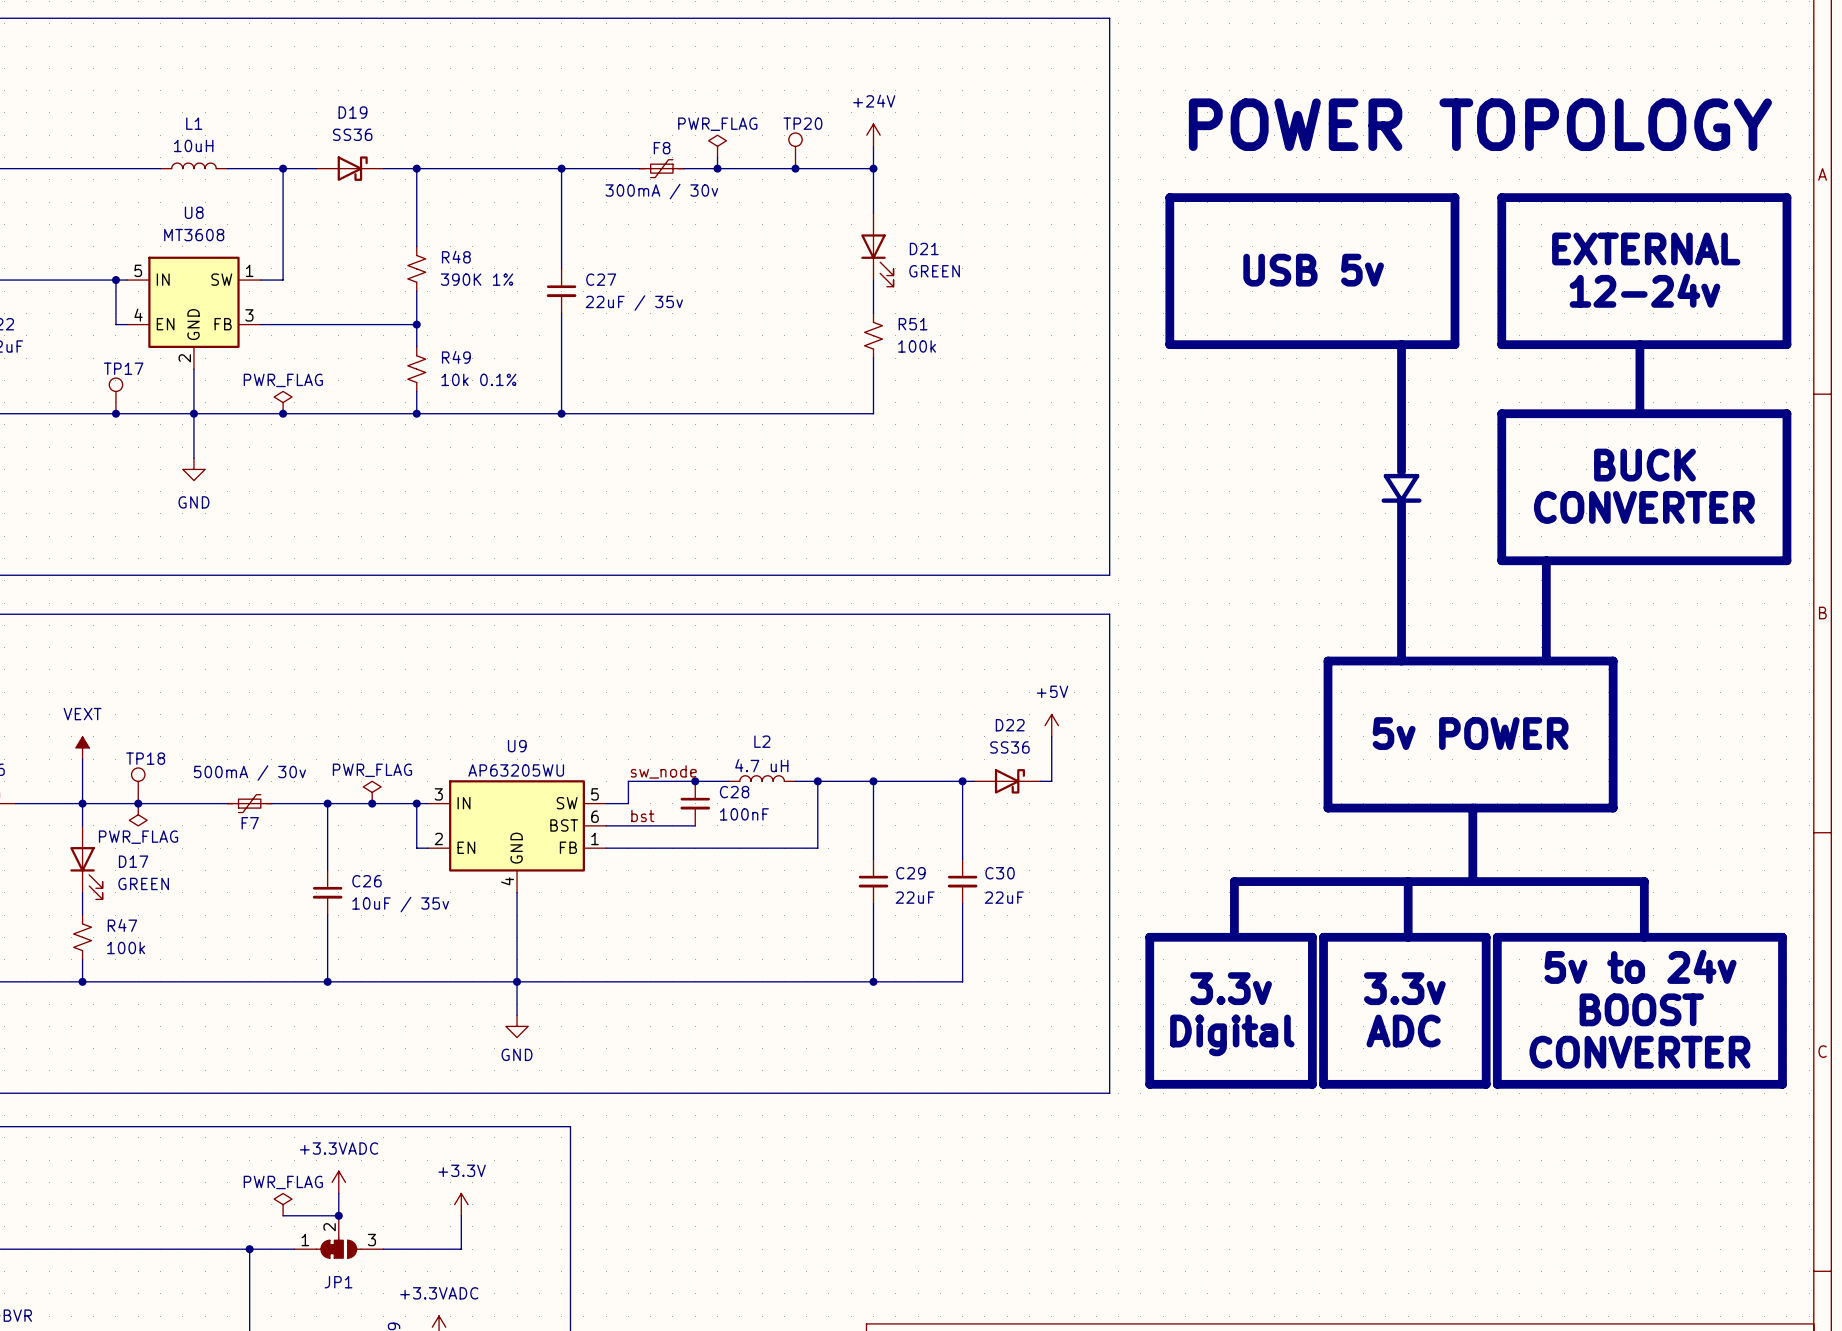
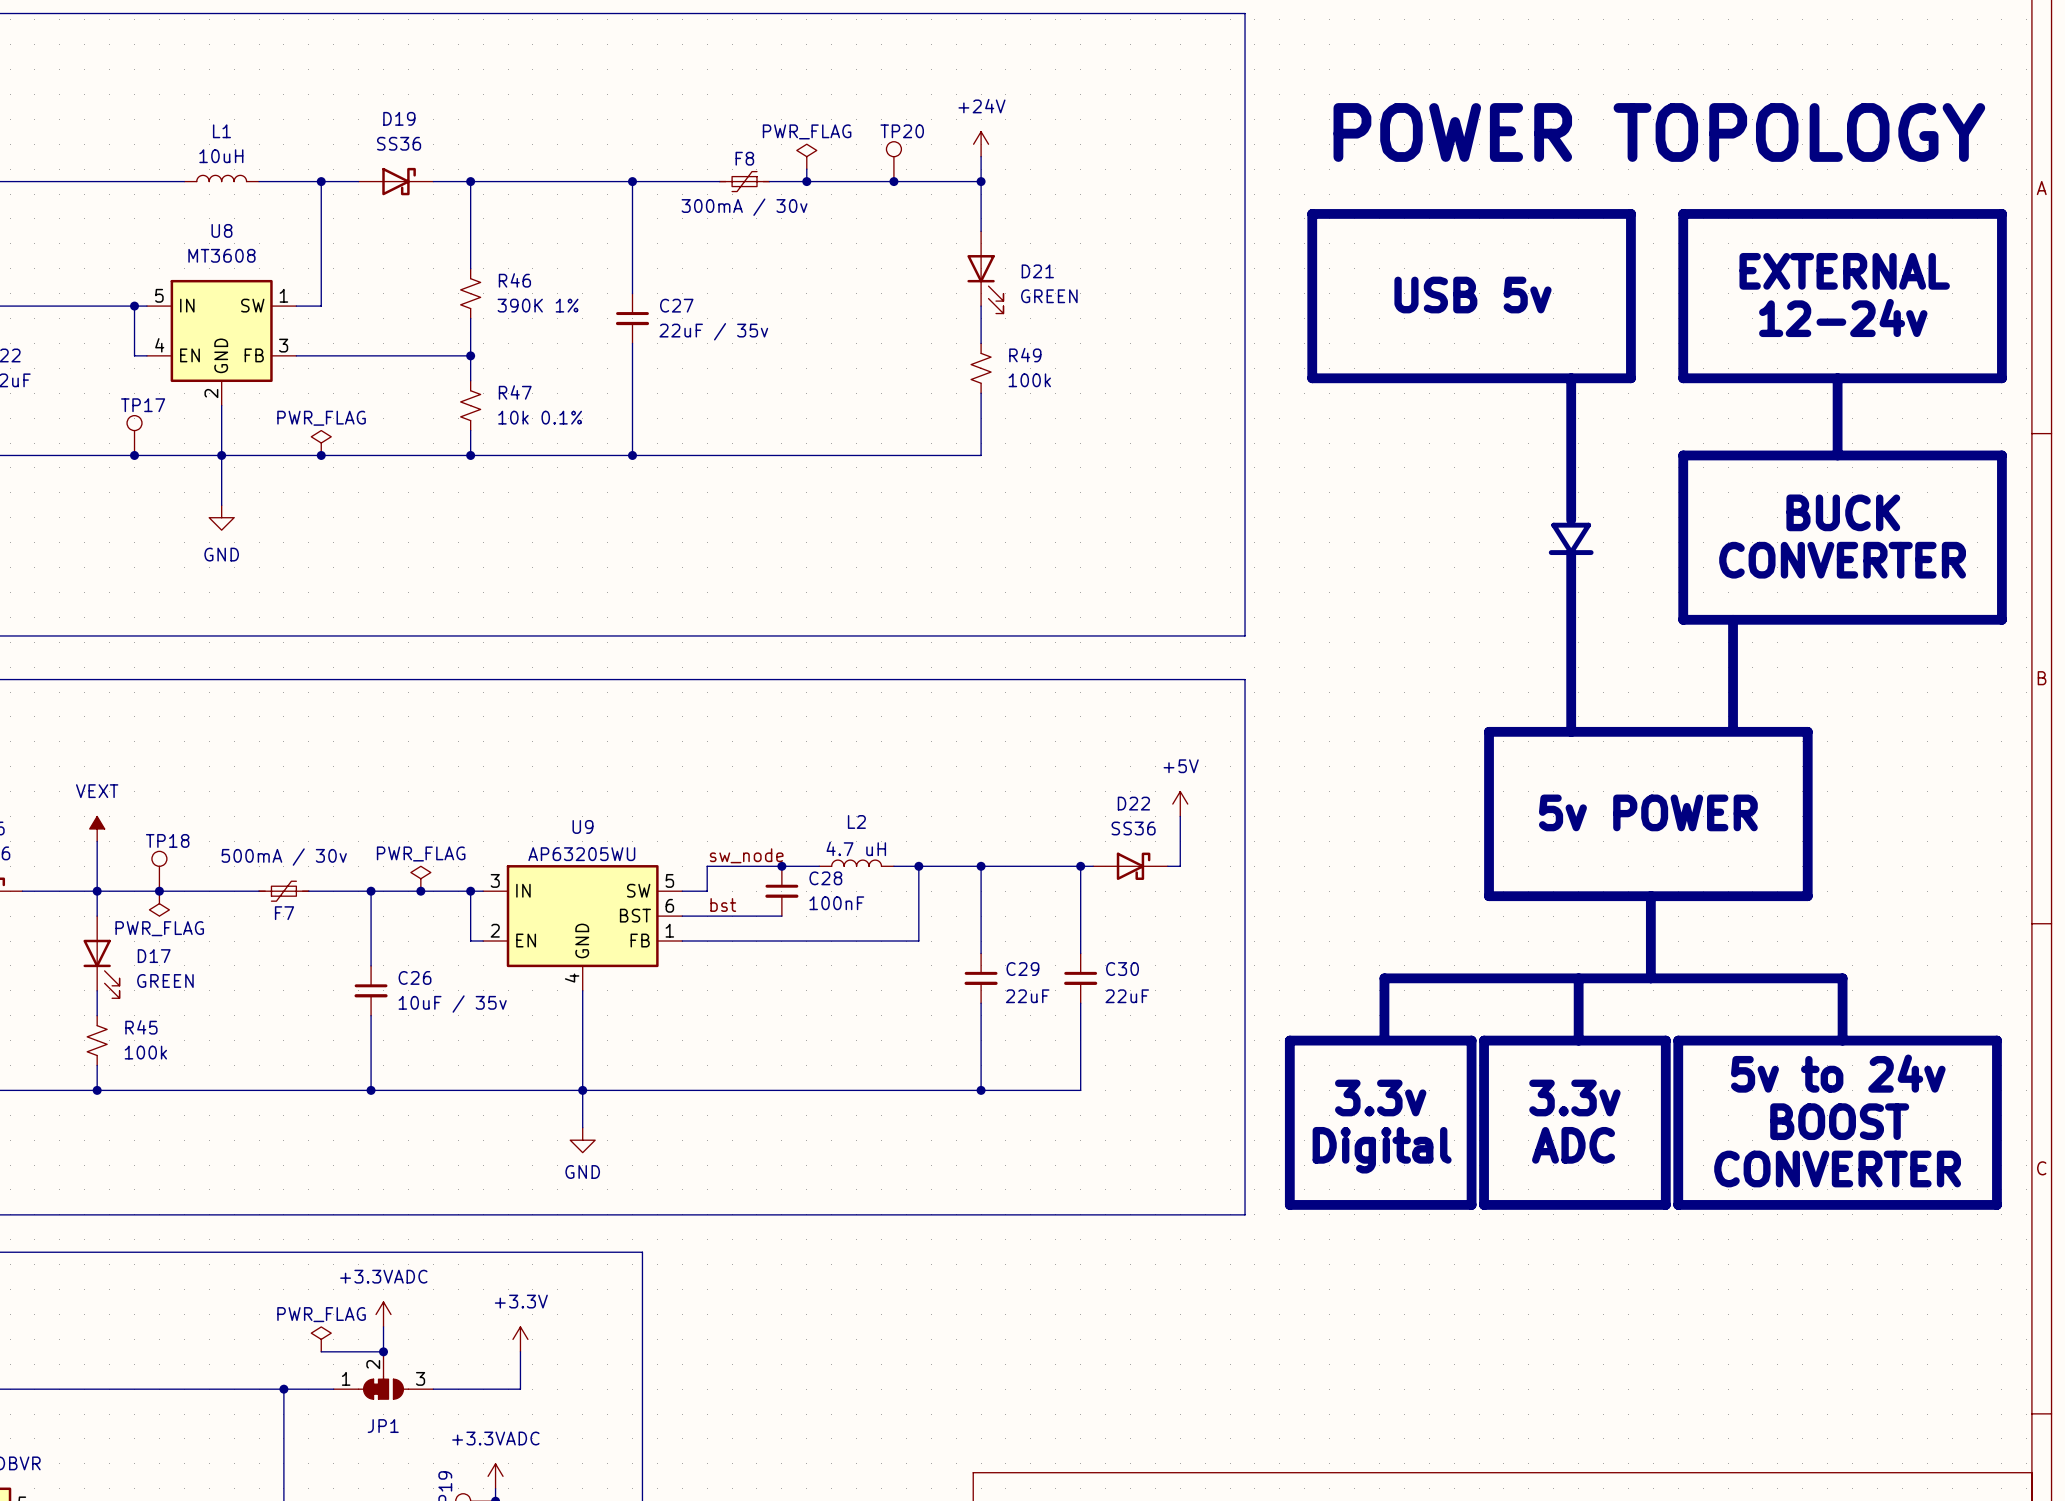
R48 name: R48 (456, 257) -> R46 (514, 280)
R51 name: R51 (913, 324) -> R49 (1025, 355)
R49 name: R49 (456, 357) -> R47 (515, 392)
R47 name: R47 (122, 925) -> R45 (141, 1027)

